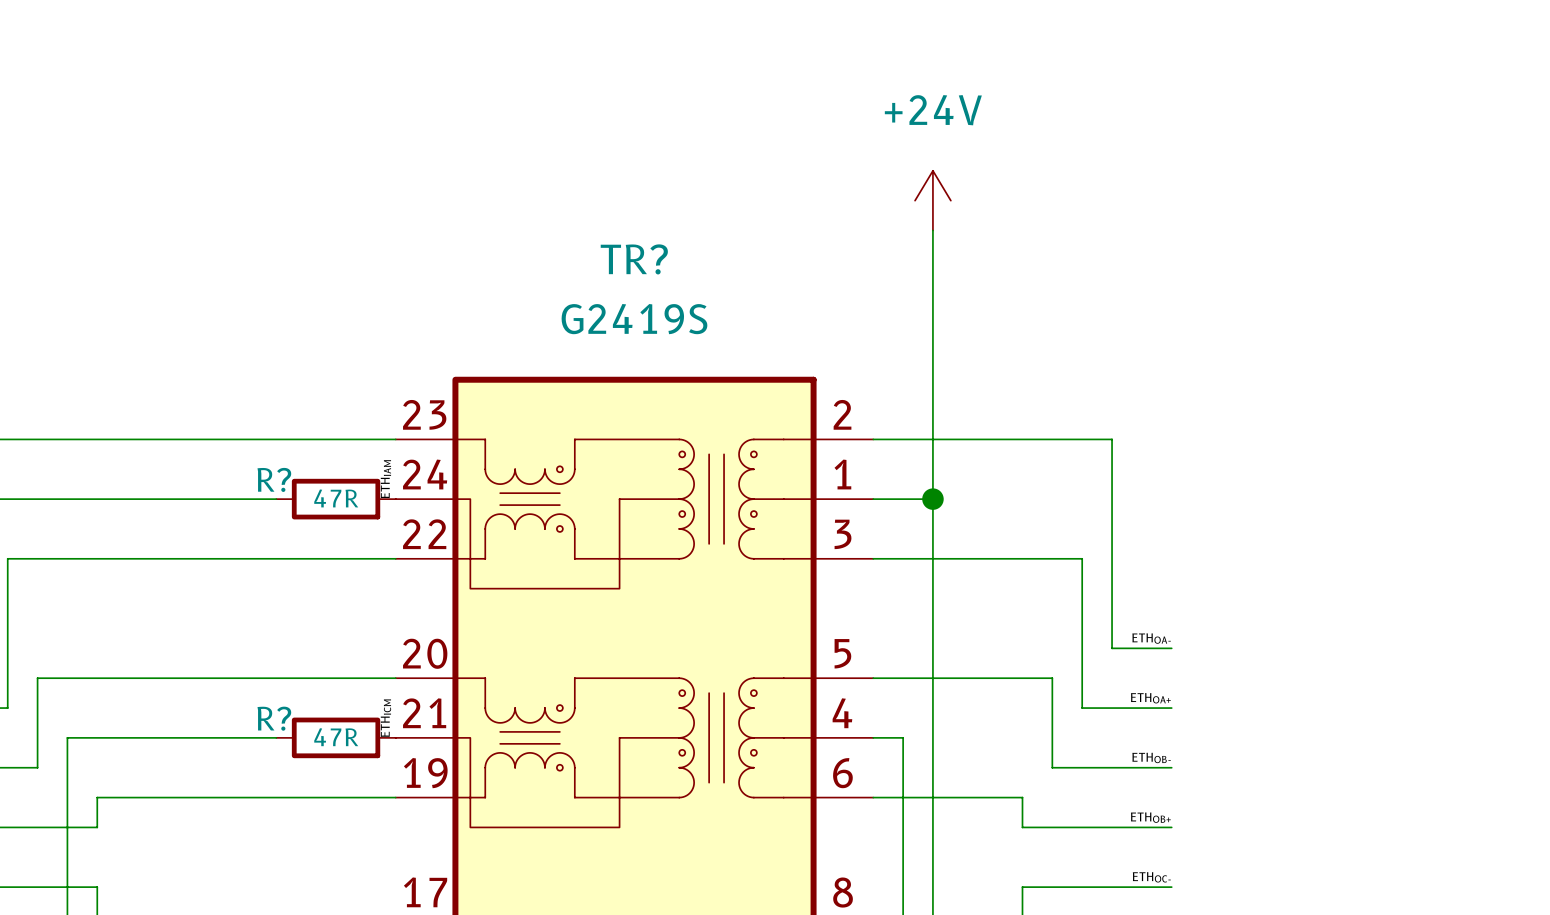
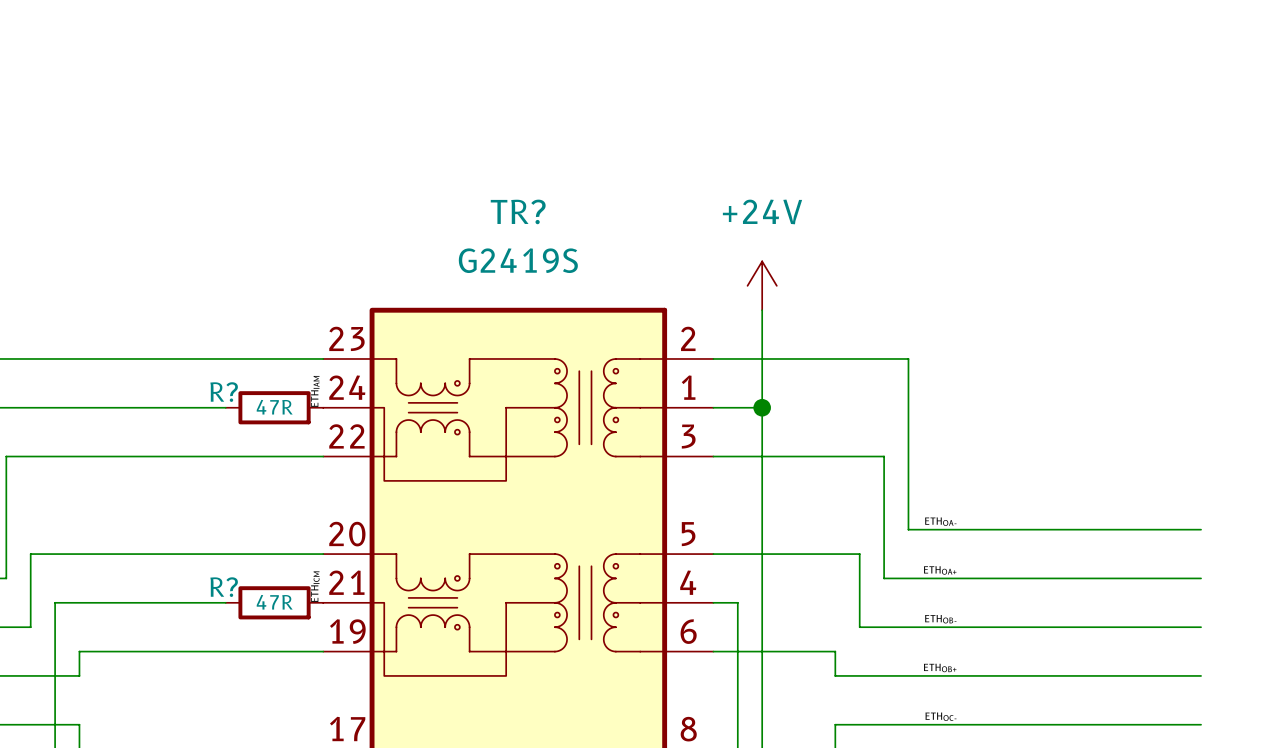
power symbol position: +24V (932, 200) -> +24V (762, 285)
wire: (932, 230) (932, 379) -> none
wire: none -> (957, 529) (1201, 529)
wire: none -> (957, 578) (1201, 578)
wire: none -> (957, 627) (1201, 627)
wire: none -> (957, 675) (1201, 675)
wire: none -> (957, 724) (1201, 724)

